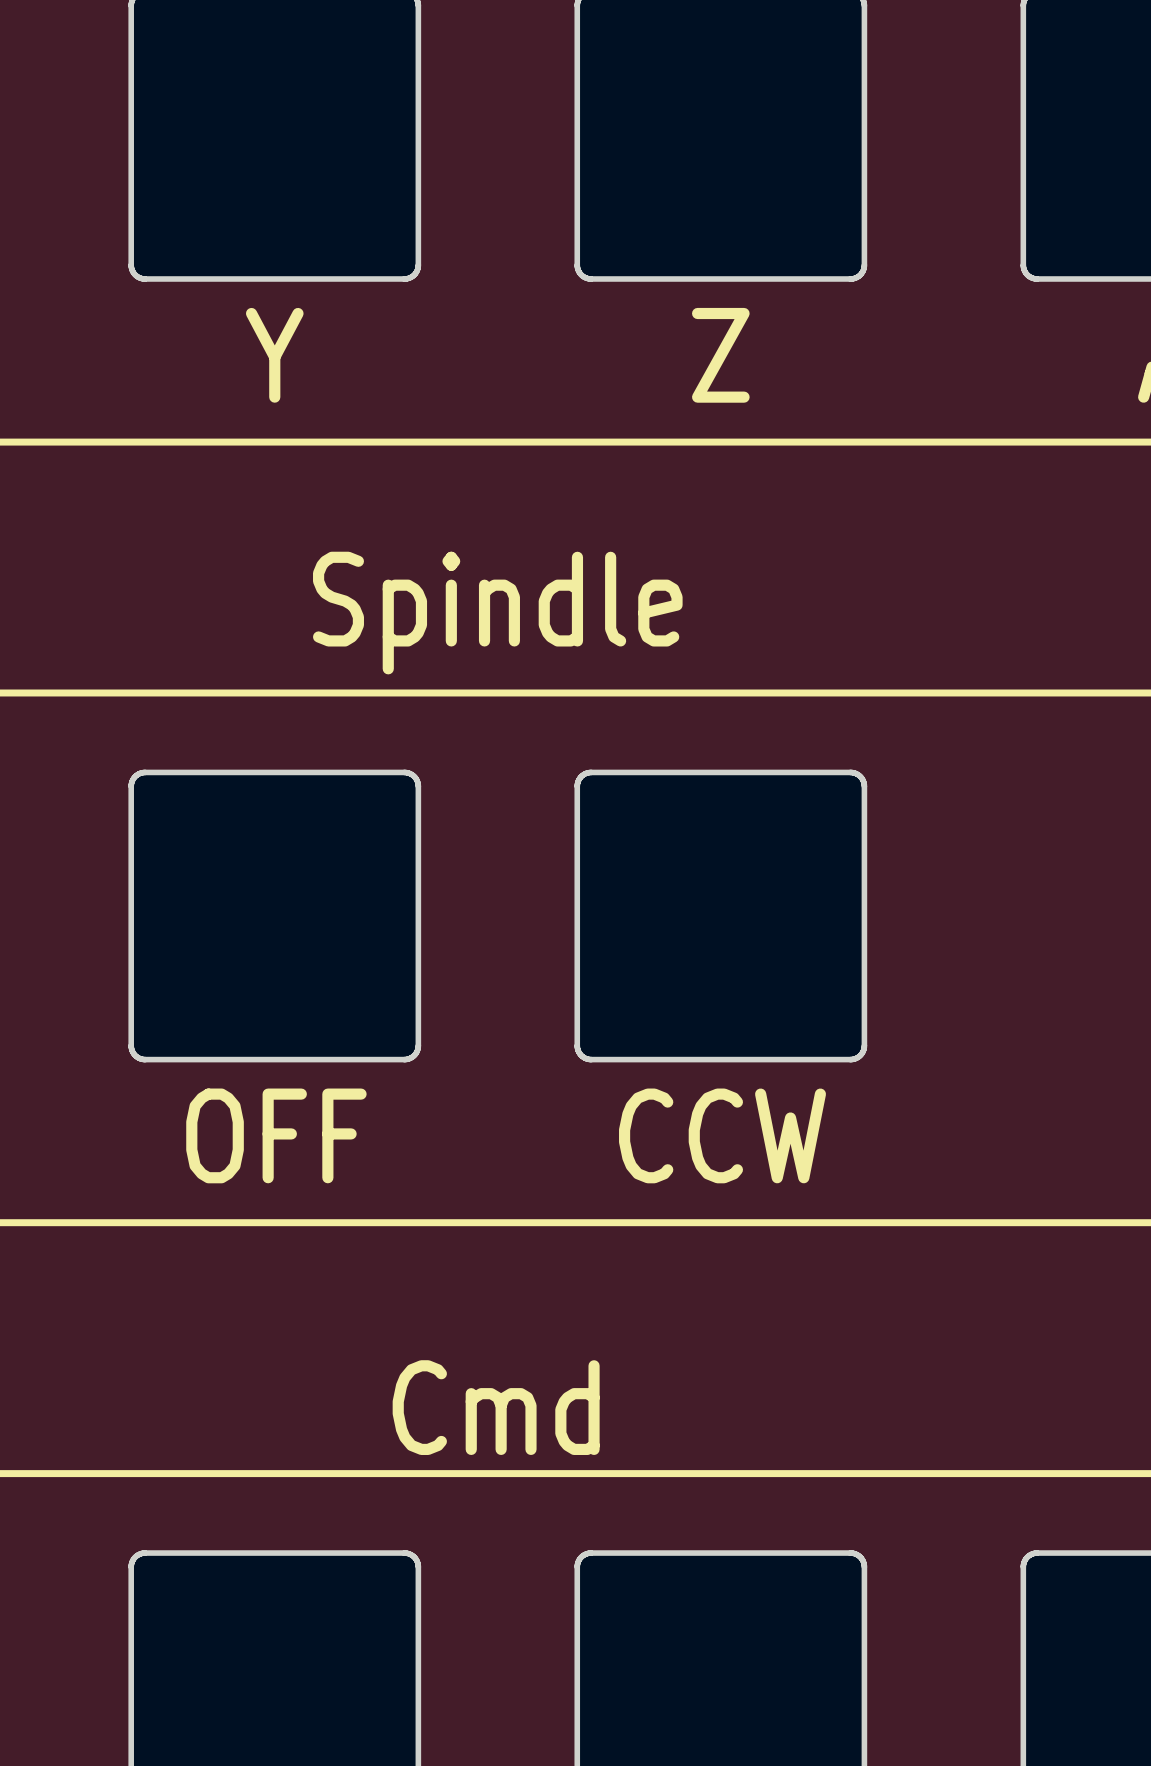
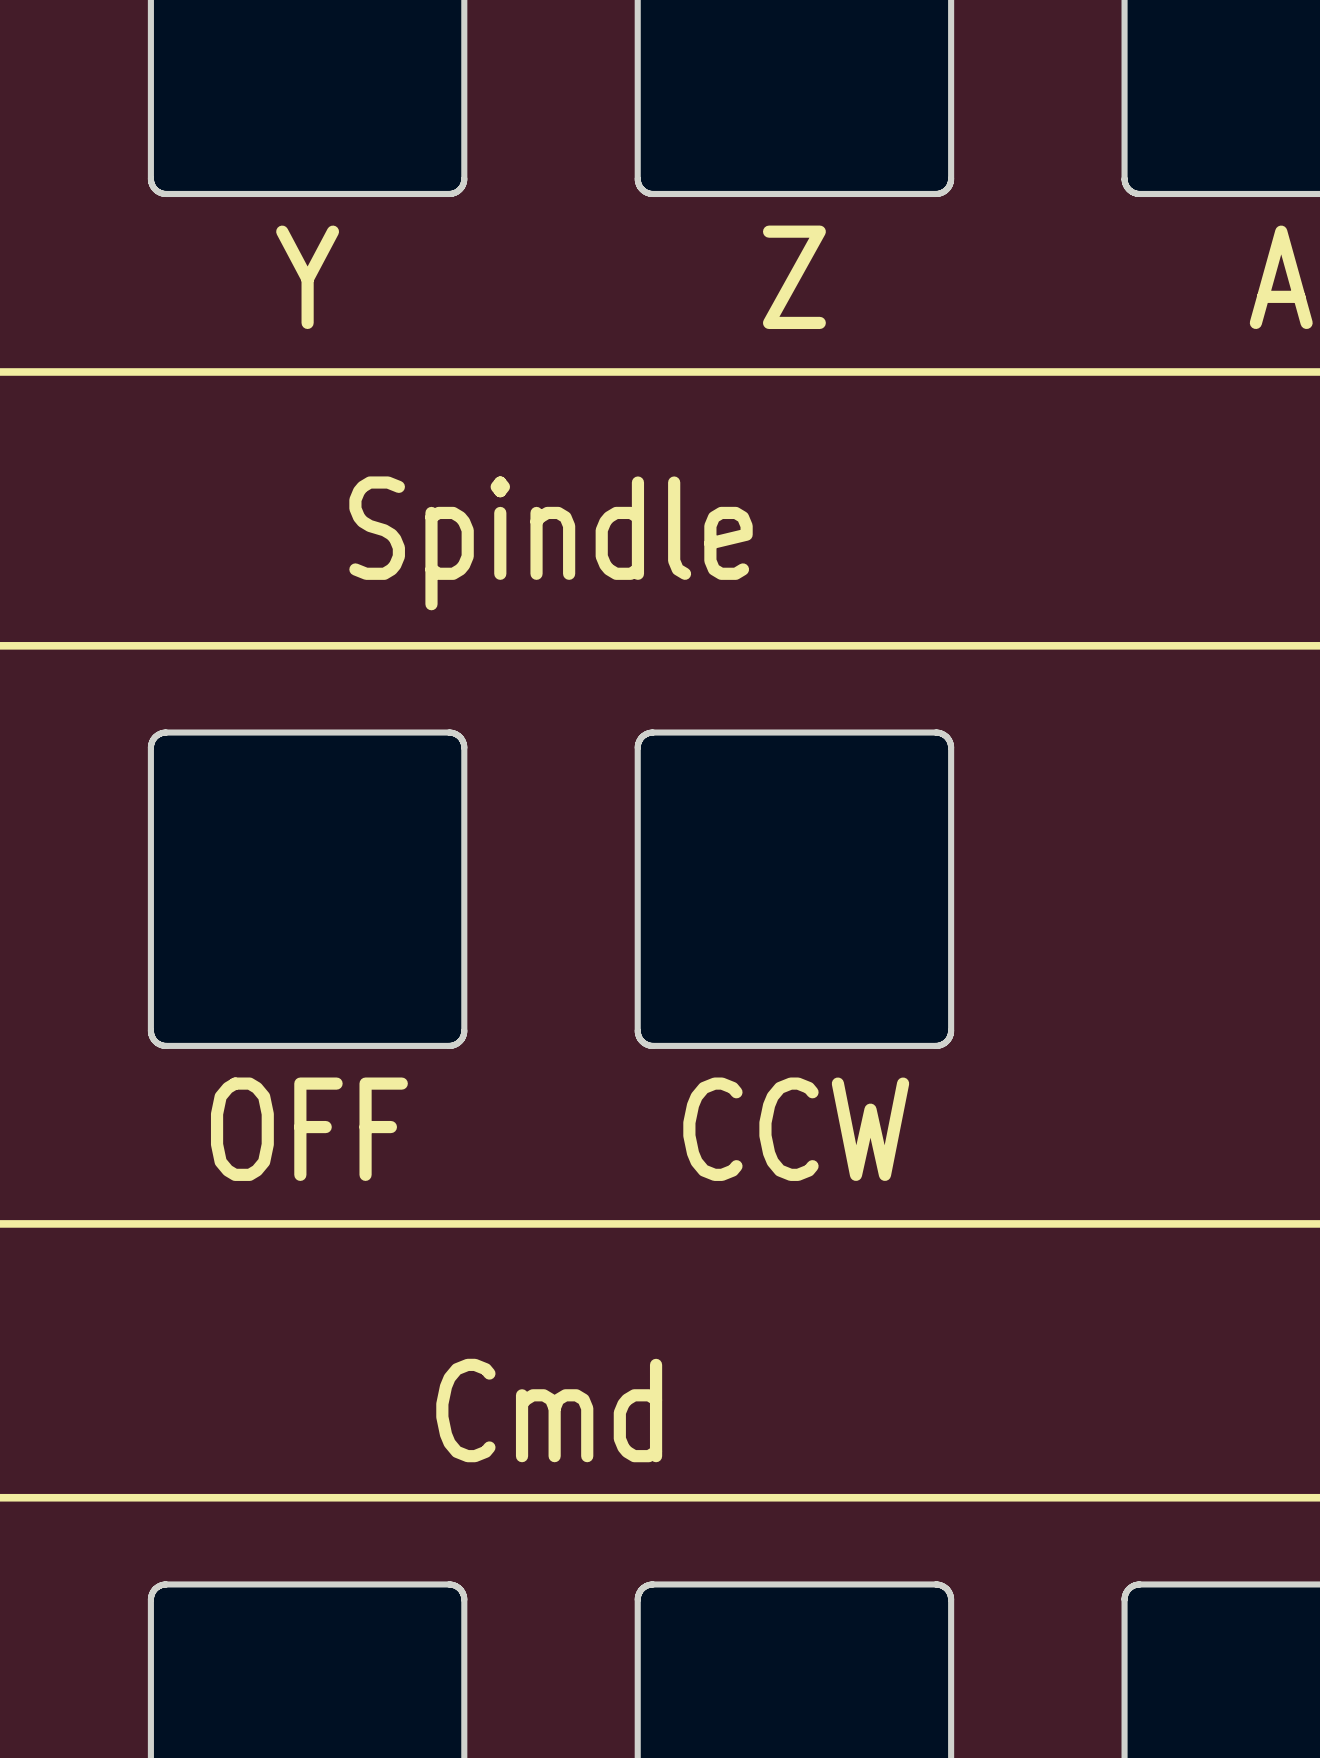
text position: Spindle (497, 613) -> Spindle (551, 543)
text position: Cmd (496, 1407) -> Cmd (549, 1410)

